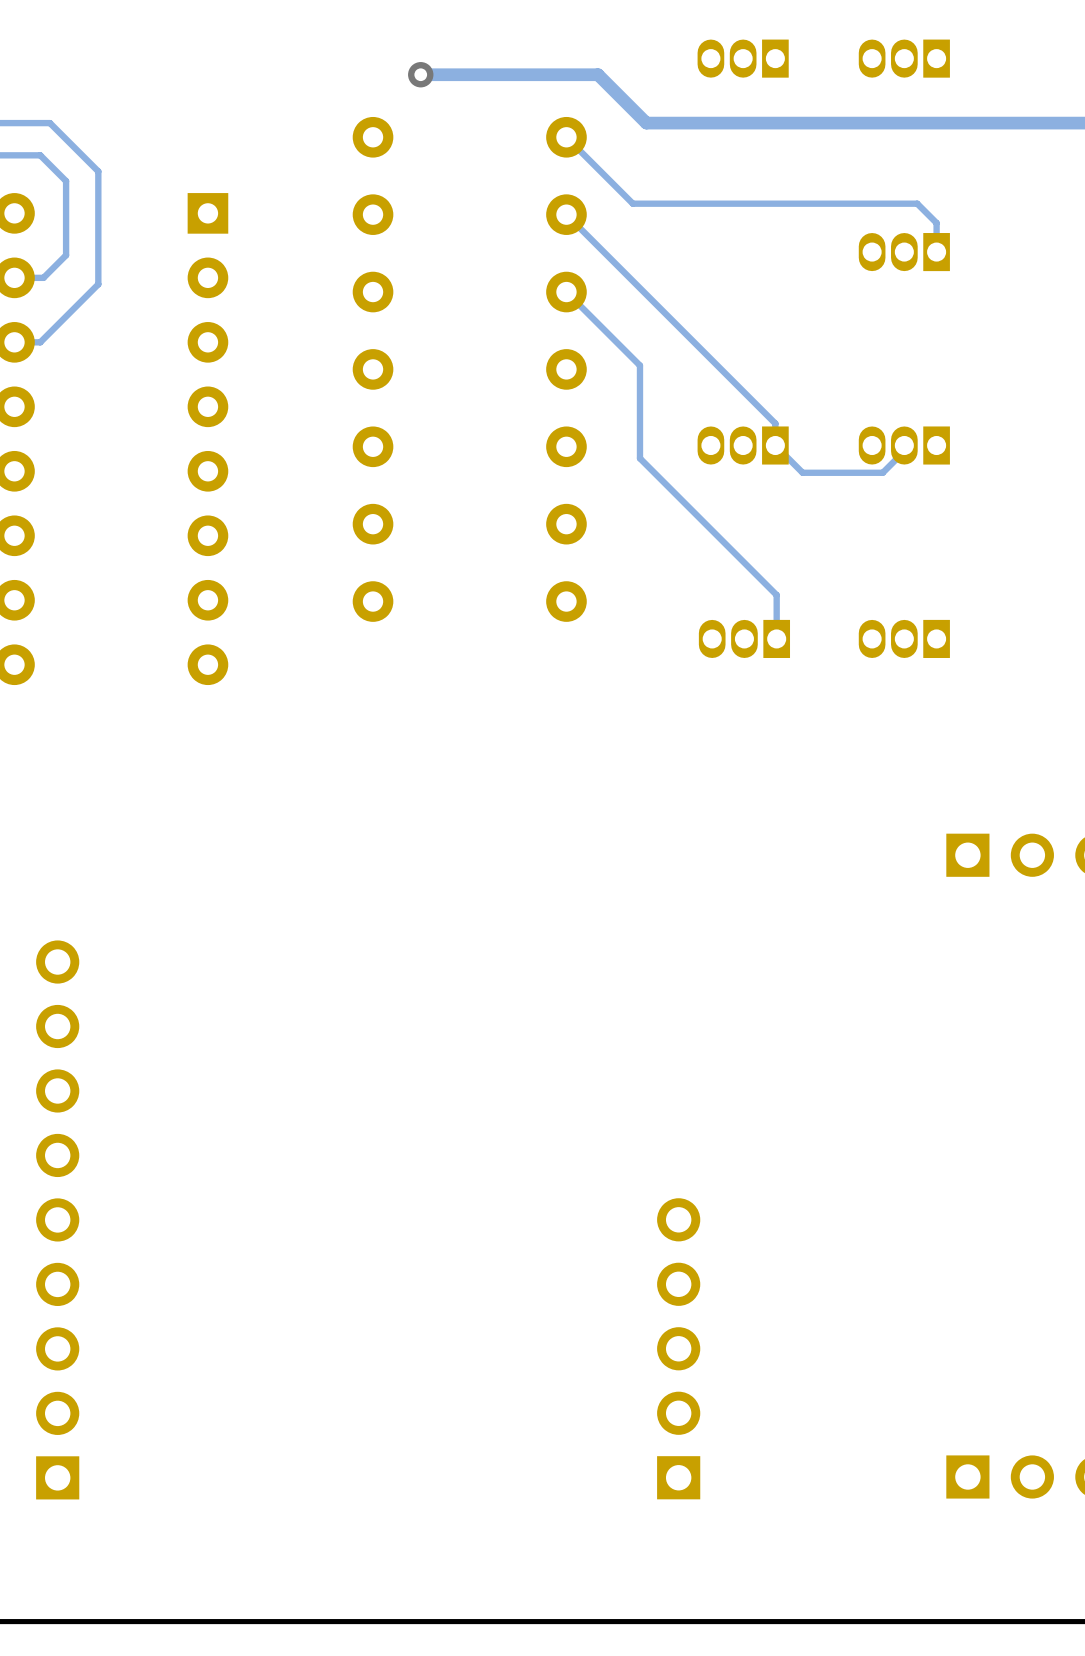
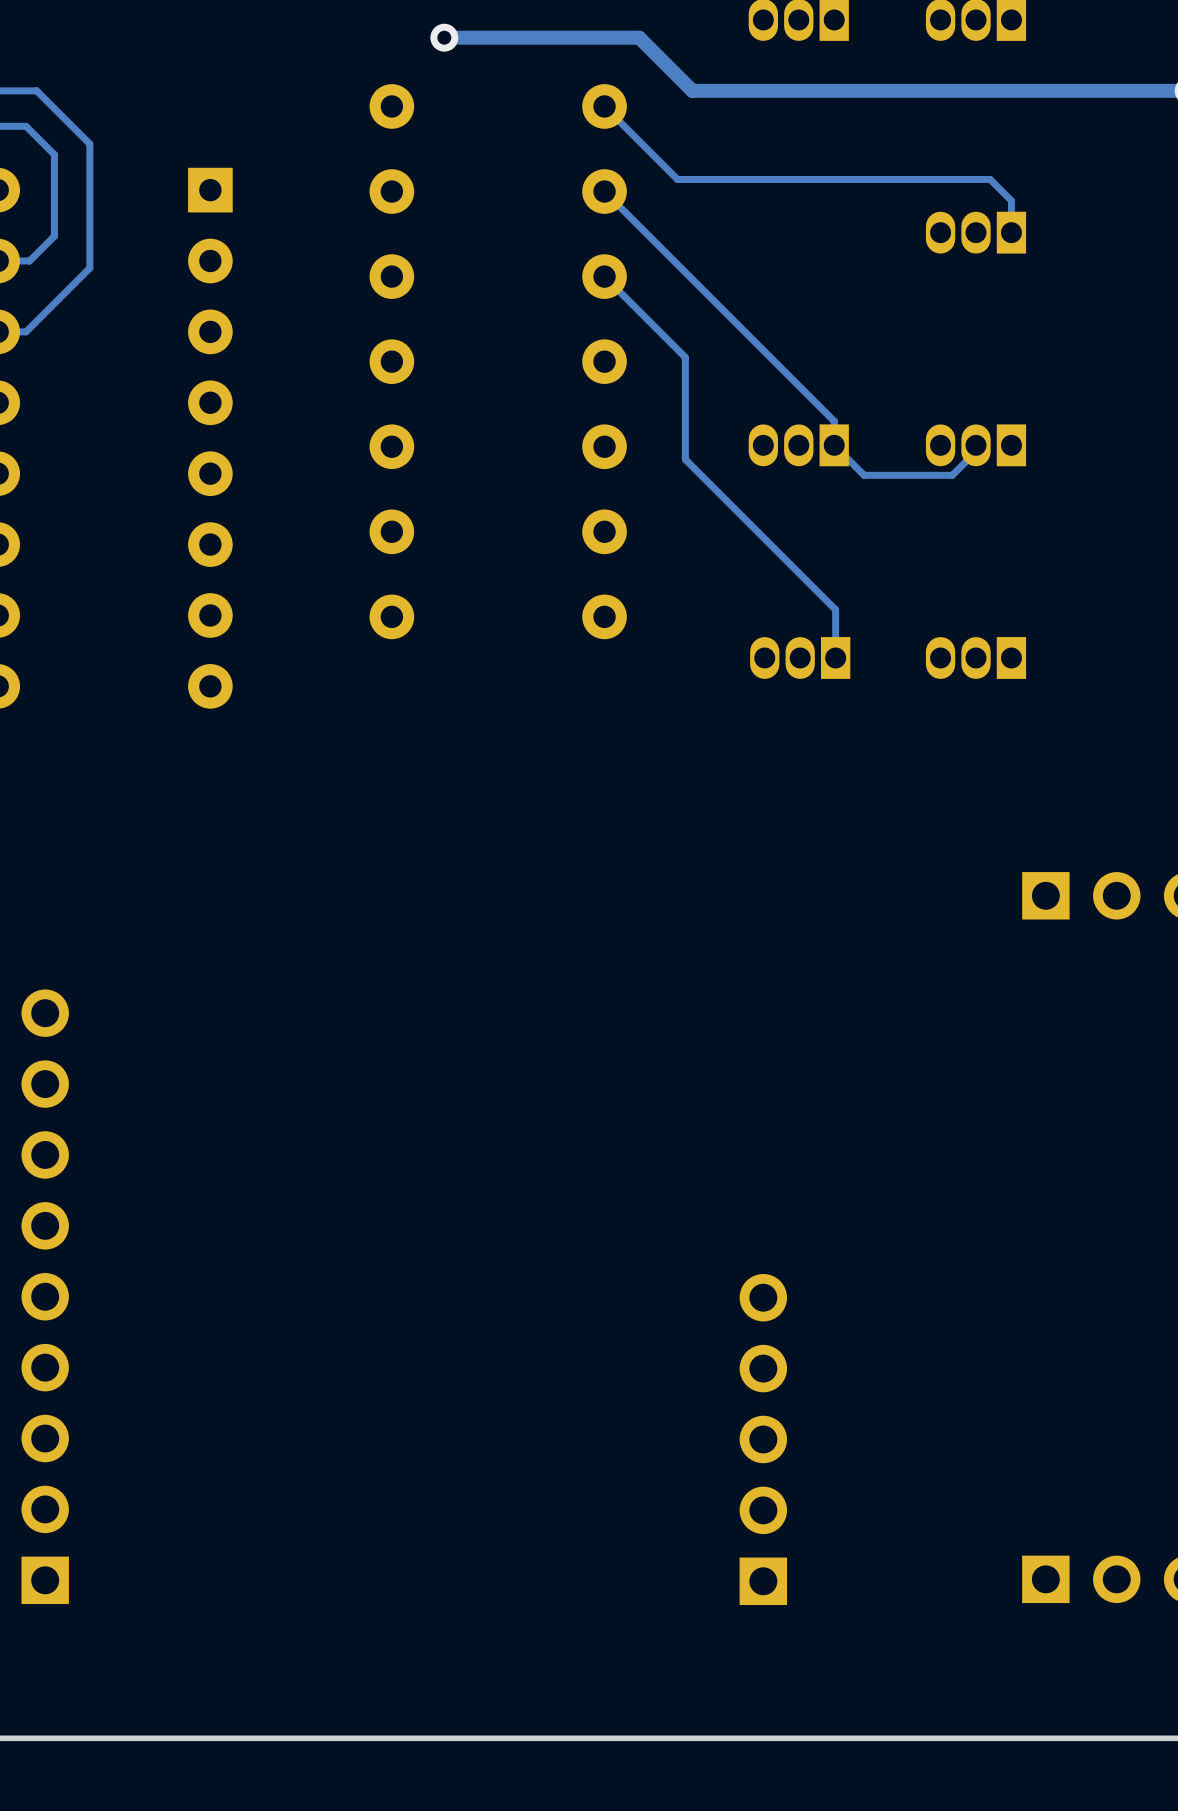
part position: (678, 1348) -> (763, 1439)

